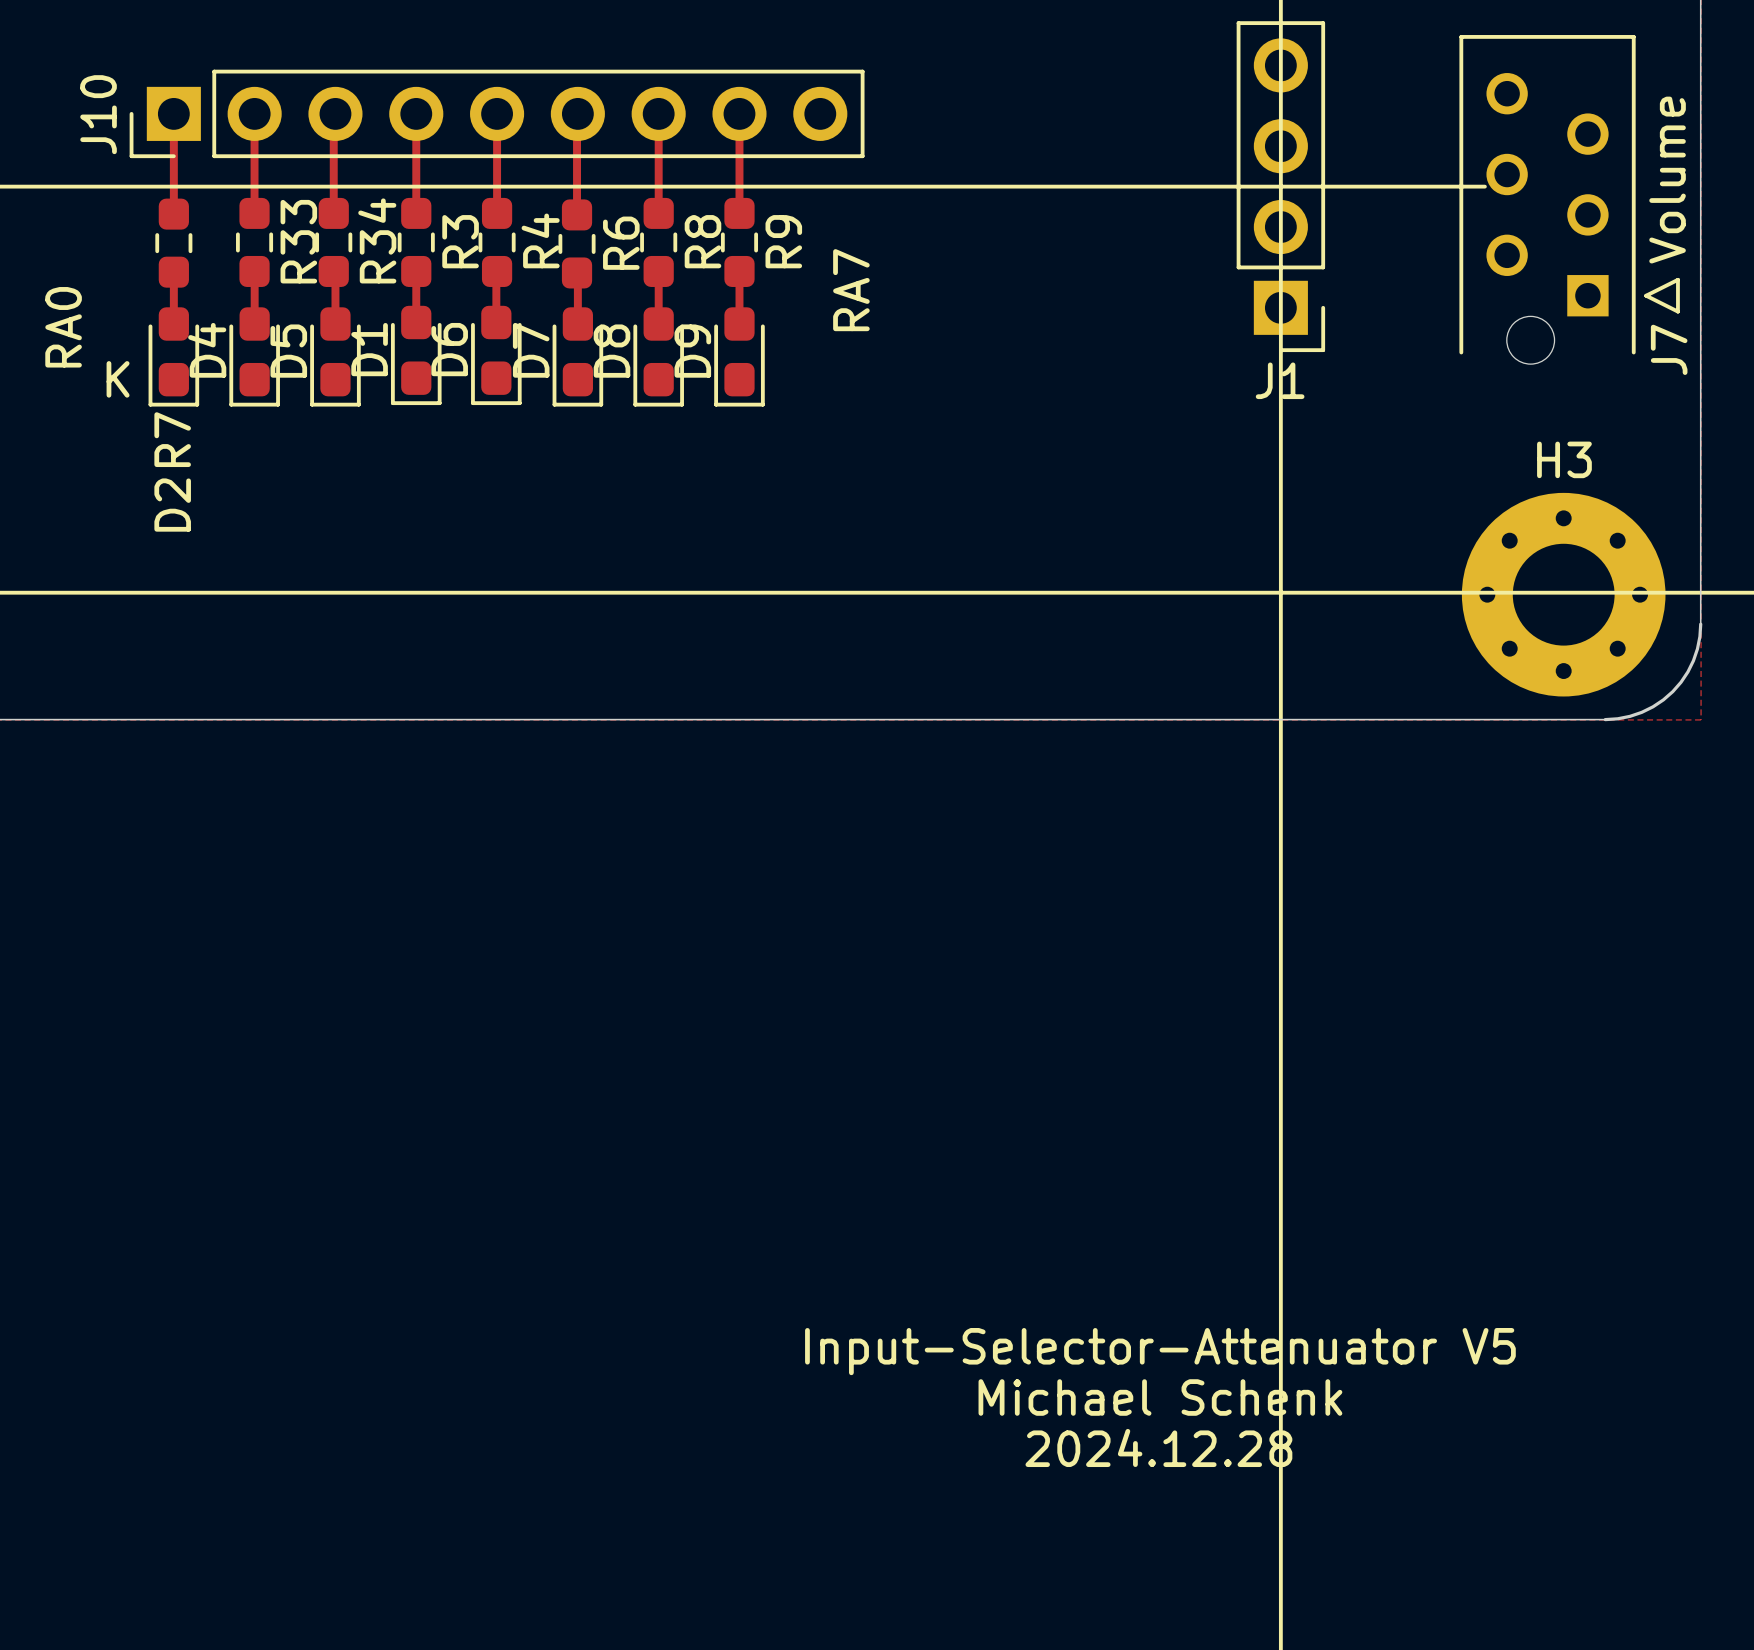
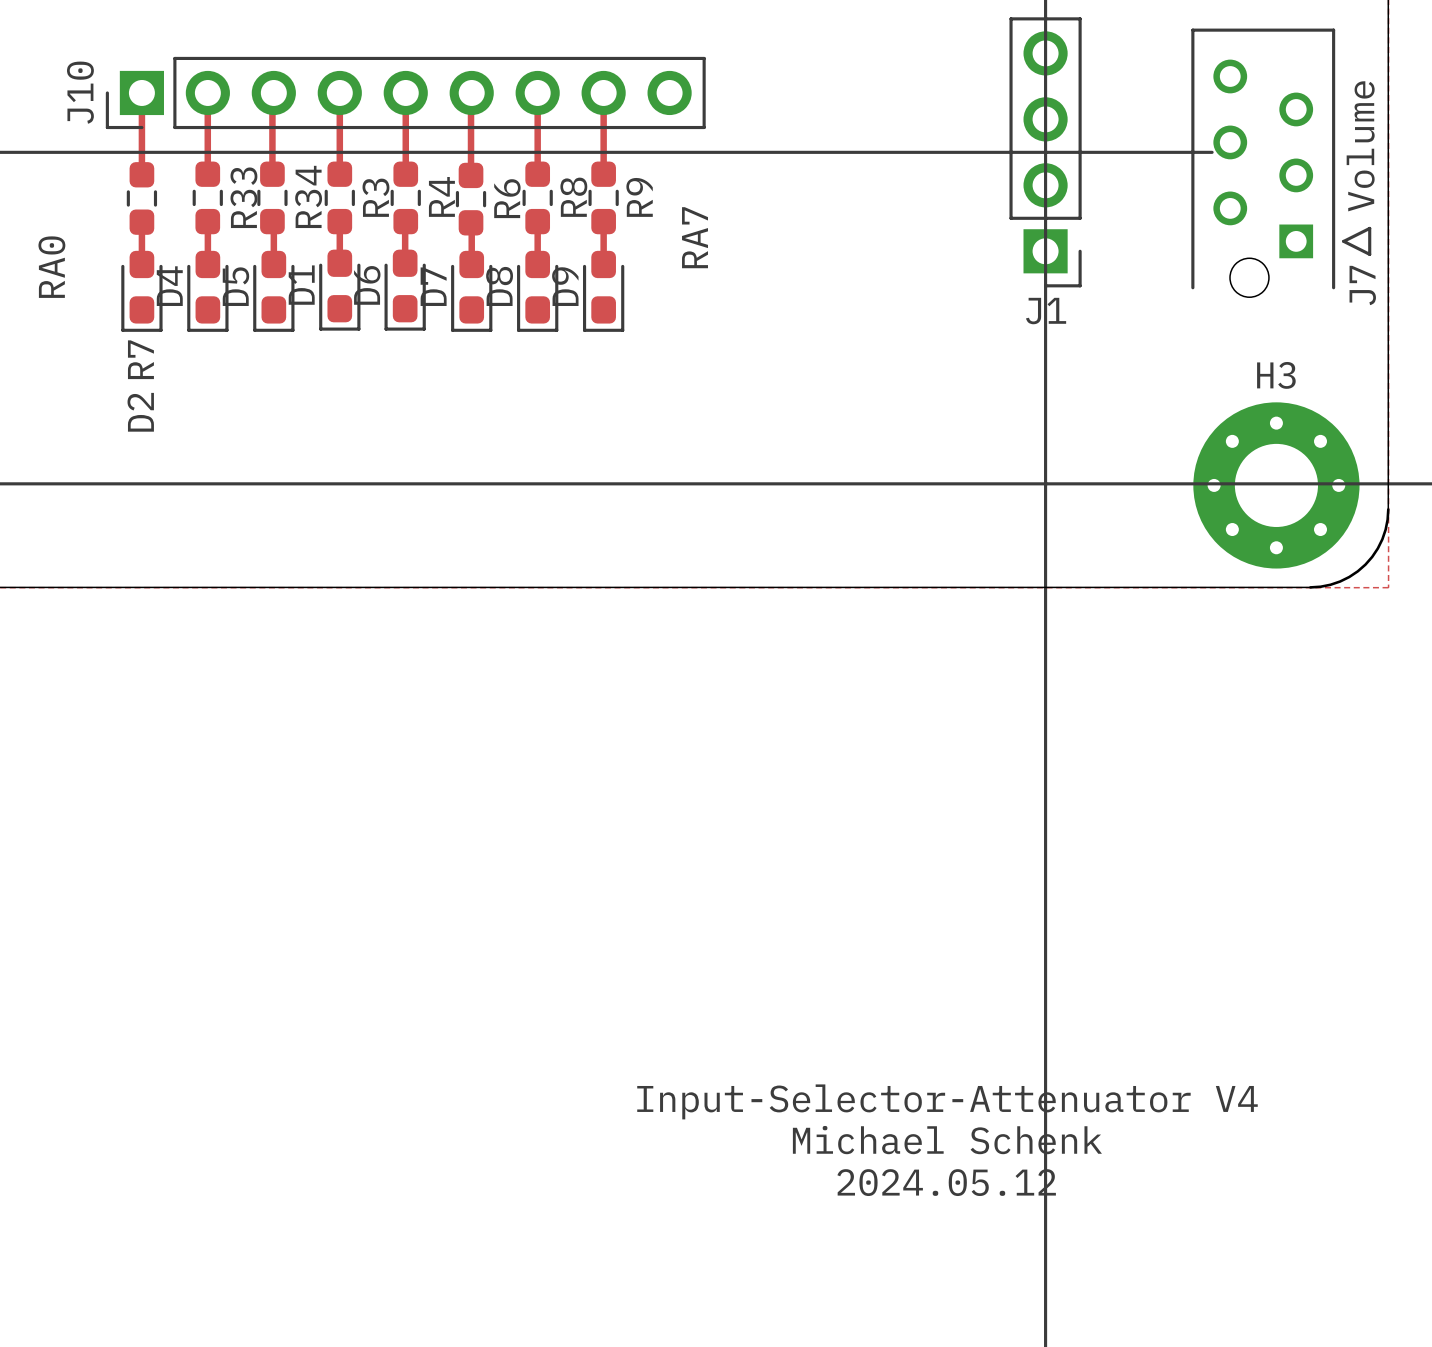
text: K (118, 379) -> none
text: Input-Selector-Attenuator V5 (1160, 1351) -> Input-Selector-Attenuator V4 (947, 1101)
text: 2024.12.28 (1158, 1447) -> 2024.05.12 (946, 1182)

